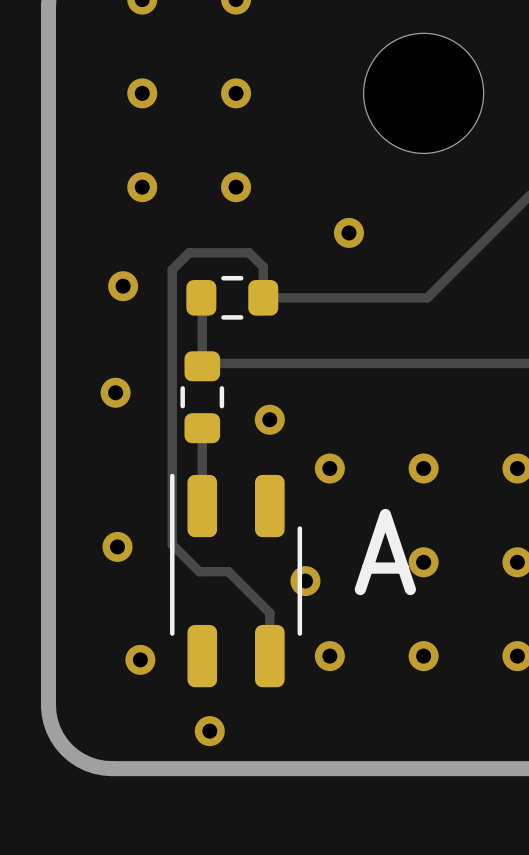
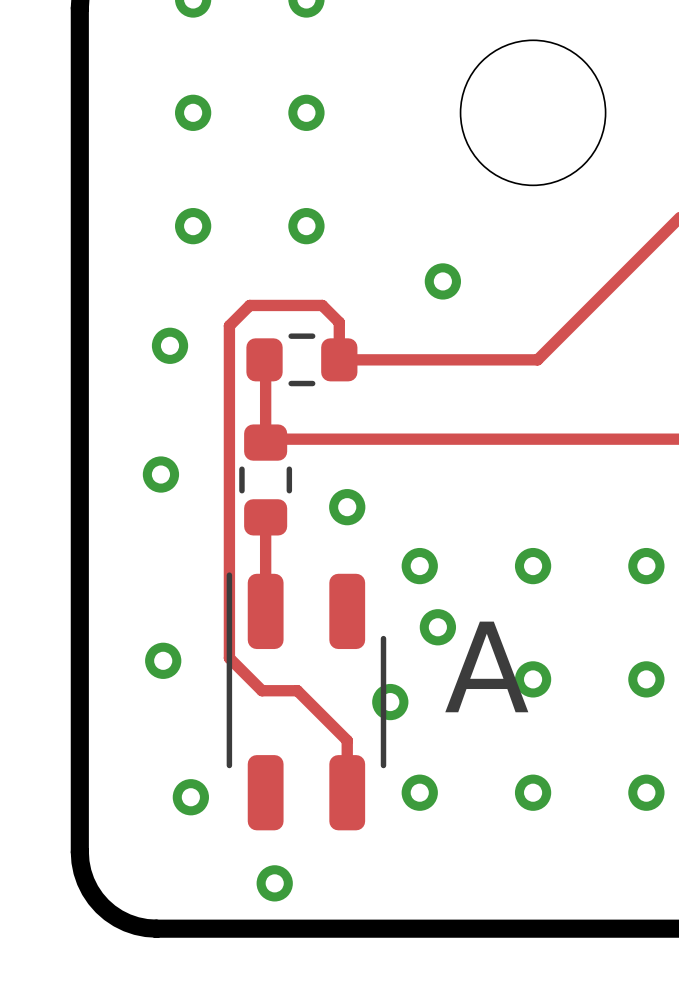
via: none -> (437, 627)

